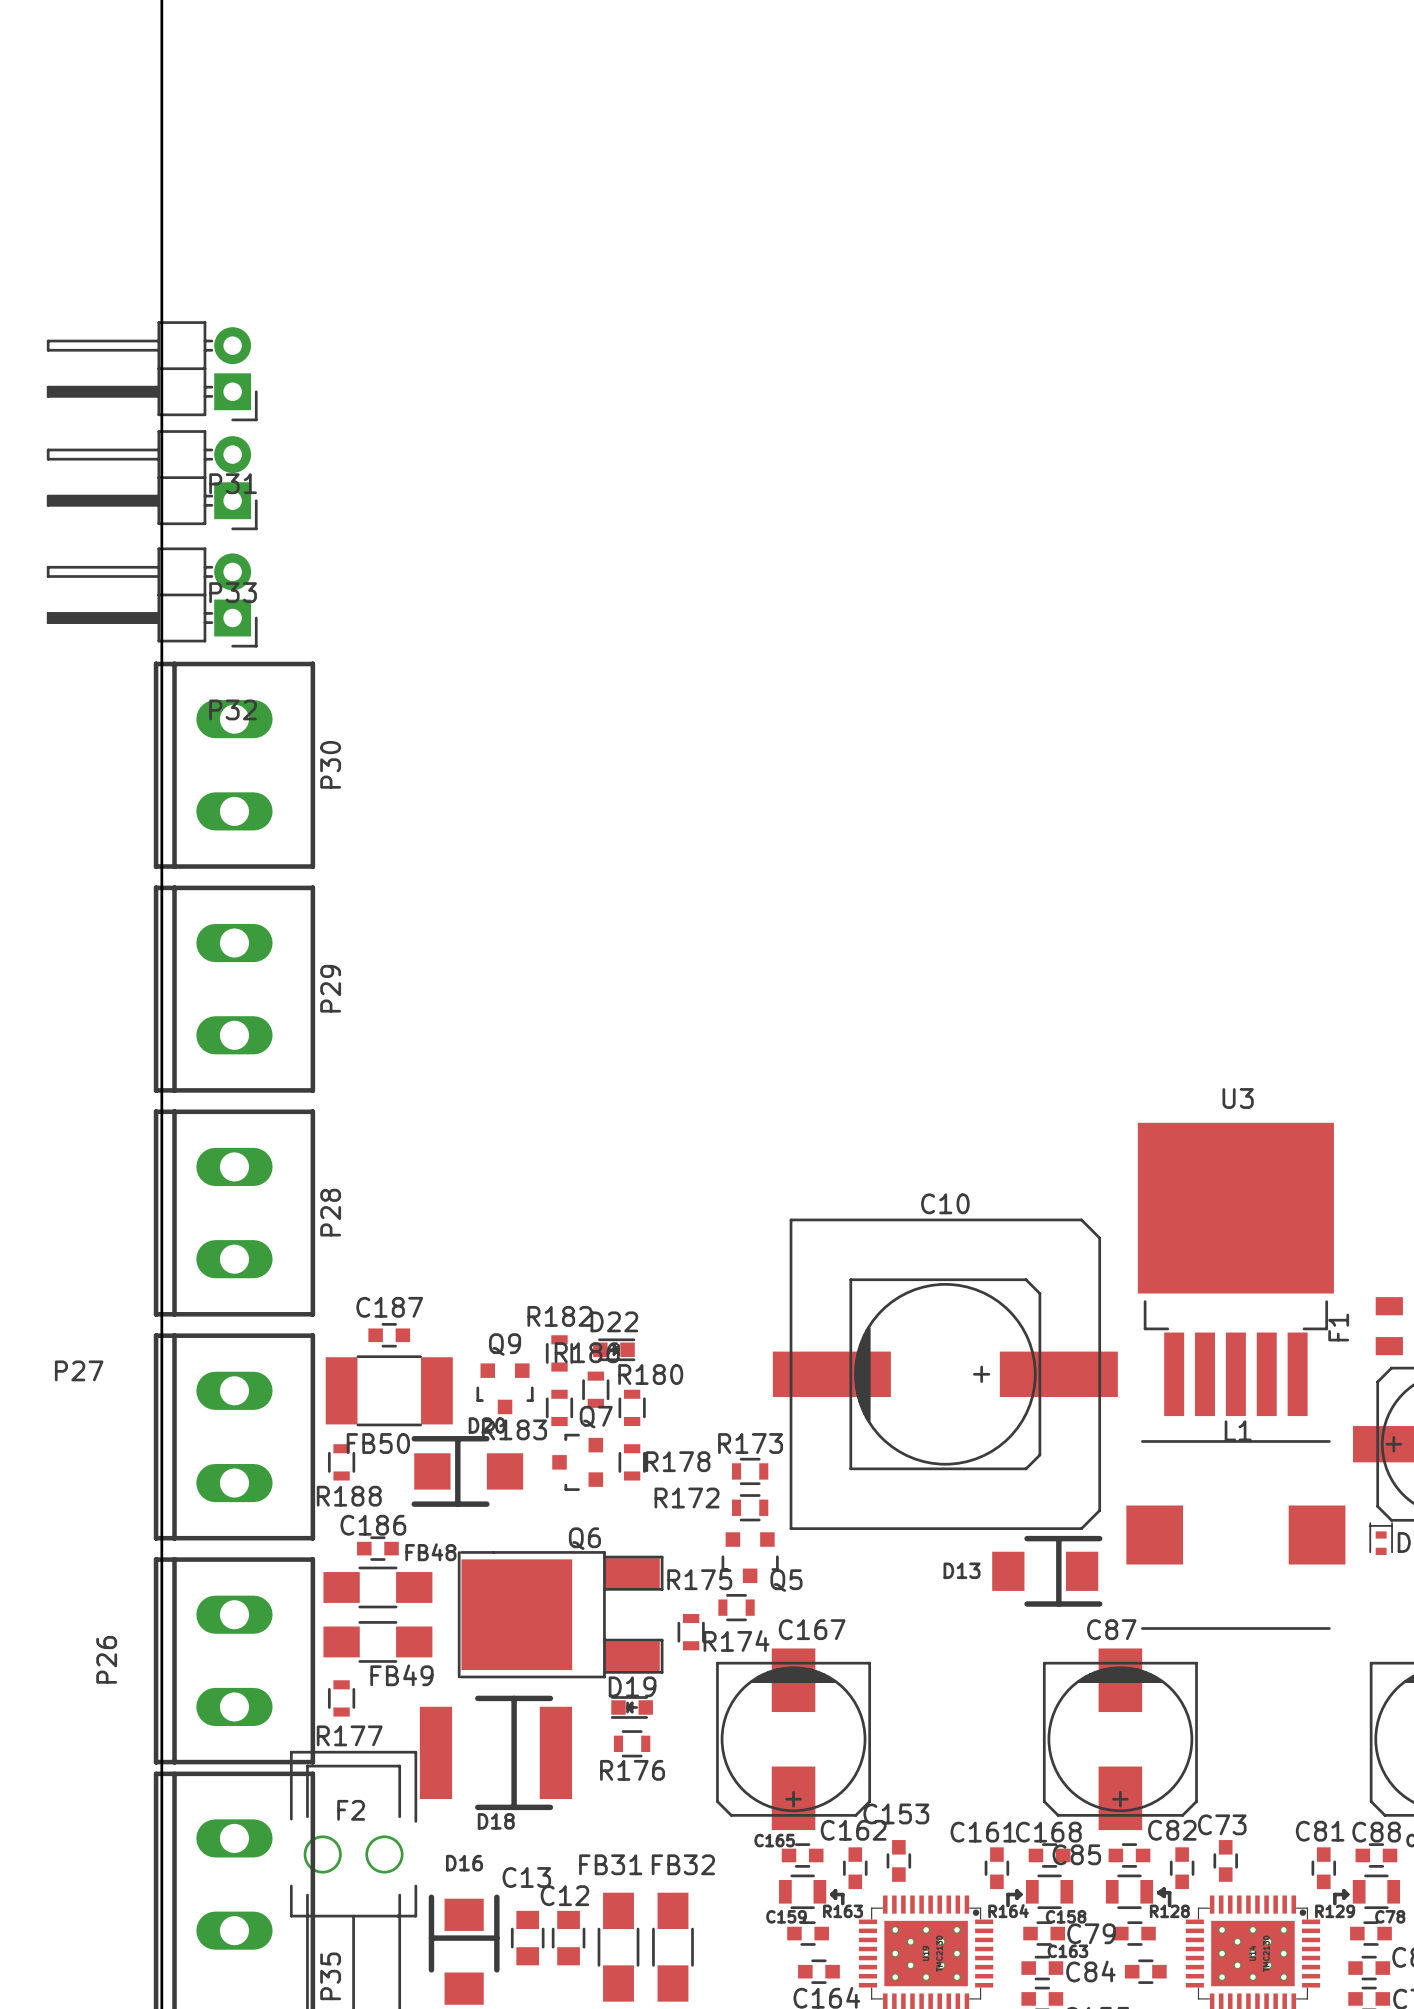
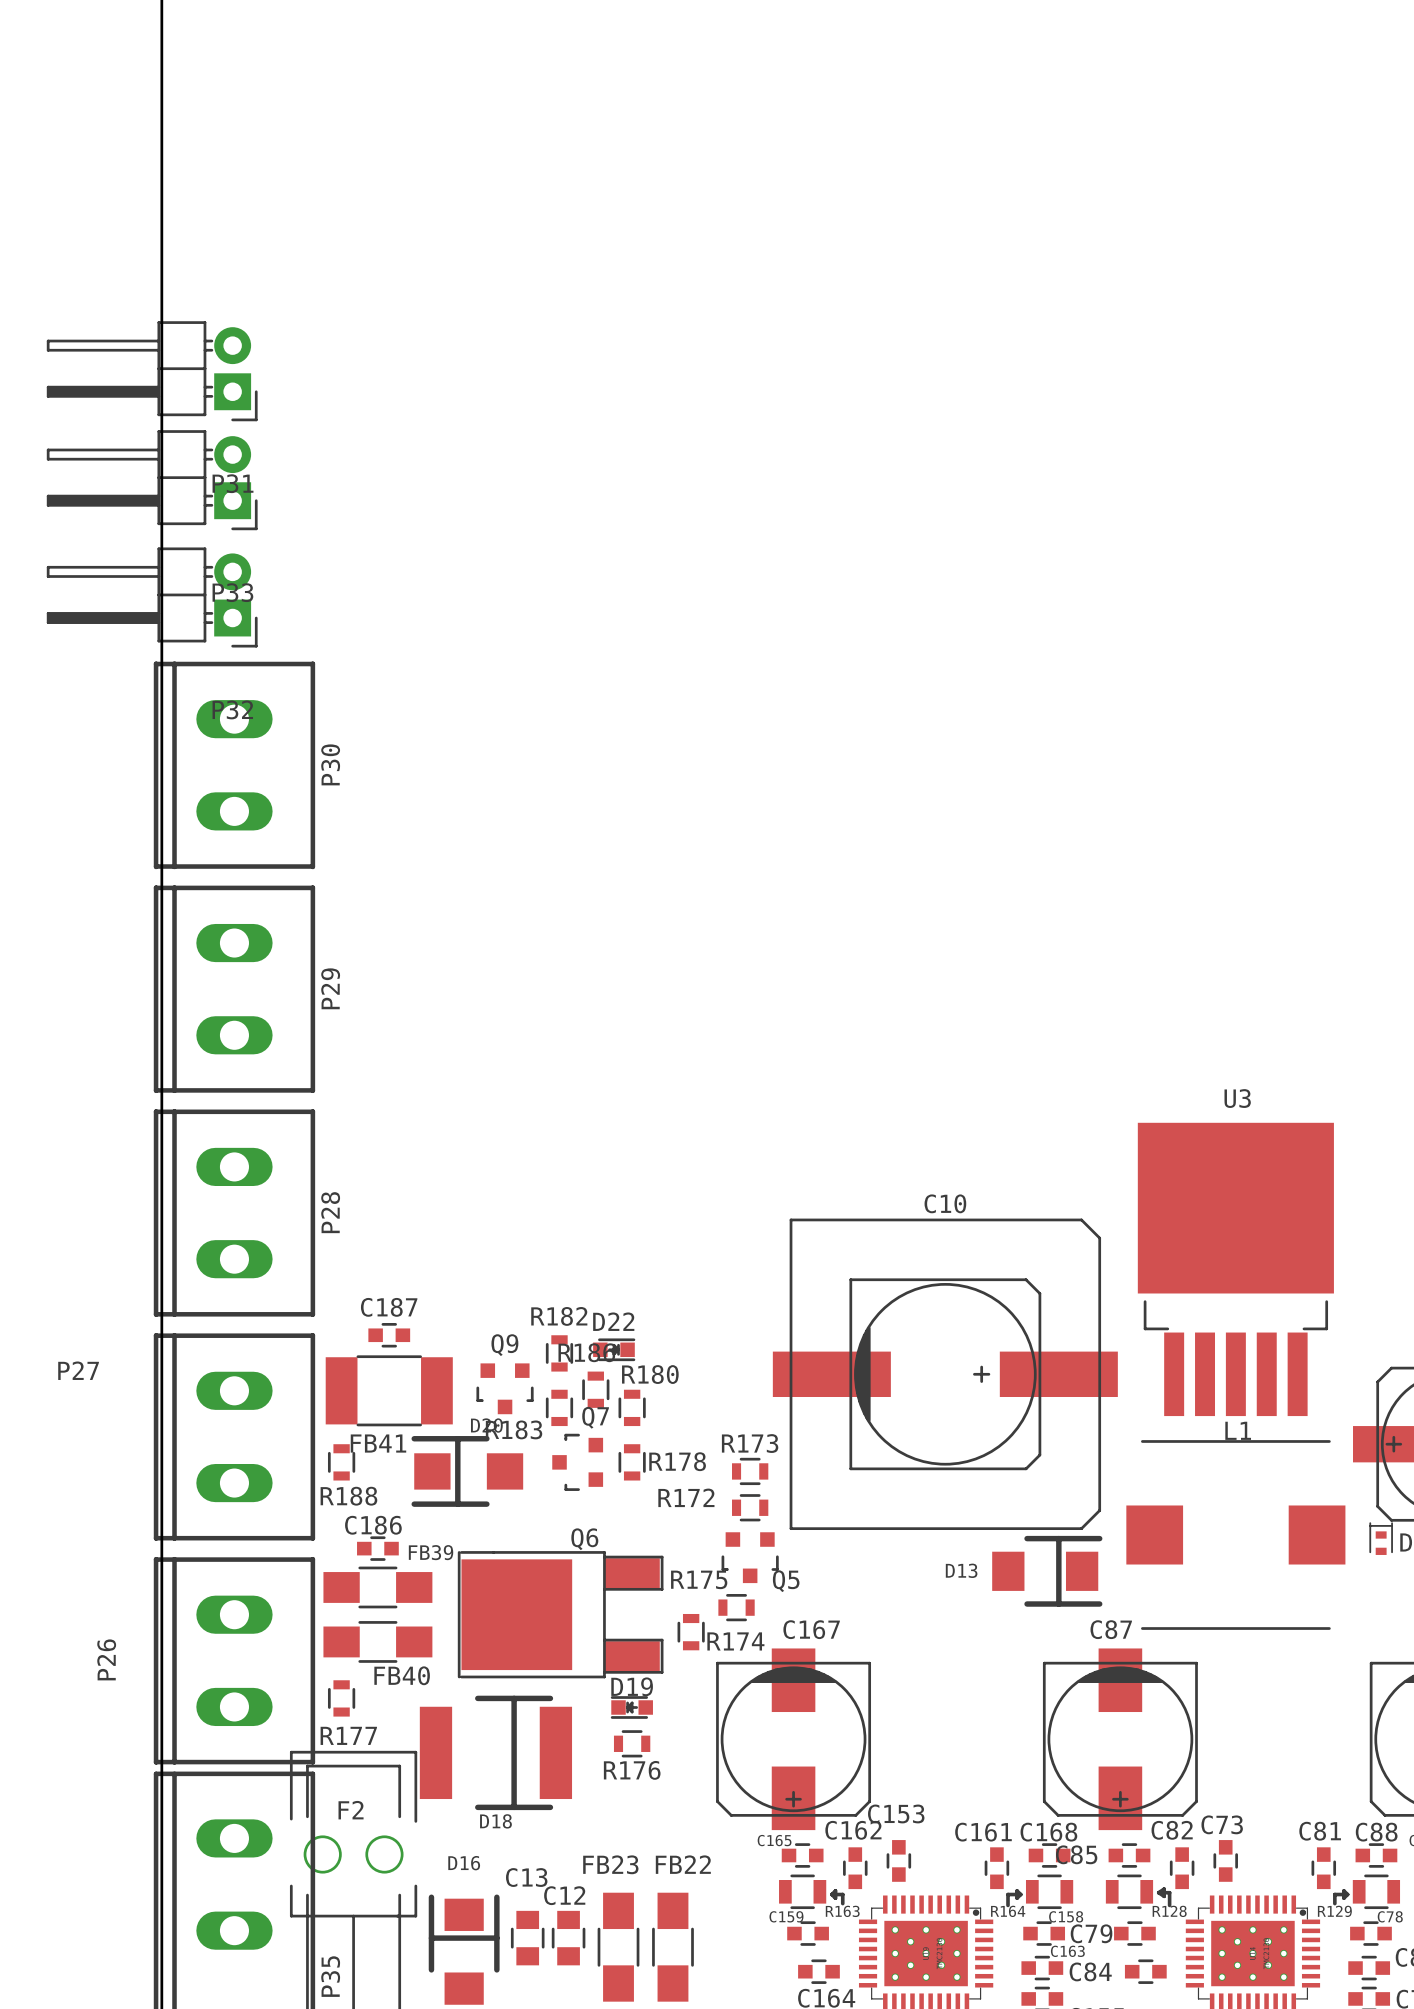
F1: (1389, 1326) -> none
FB50 name: FB50 (378, 1443) -> FB41 (378, 1443)
FB48 name: FB48 (430, 1552) -> FB39 (431, 1552)
FB49 name: FB49 (401, 1675) -> FB40 (402, 1675)
FB31 name: FB31 (610, 1864) -> FB23 (610, 1864)
FB32 name: FB32 (683, 1864) -> FB22 (683, 1864)

